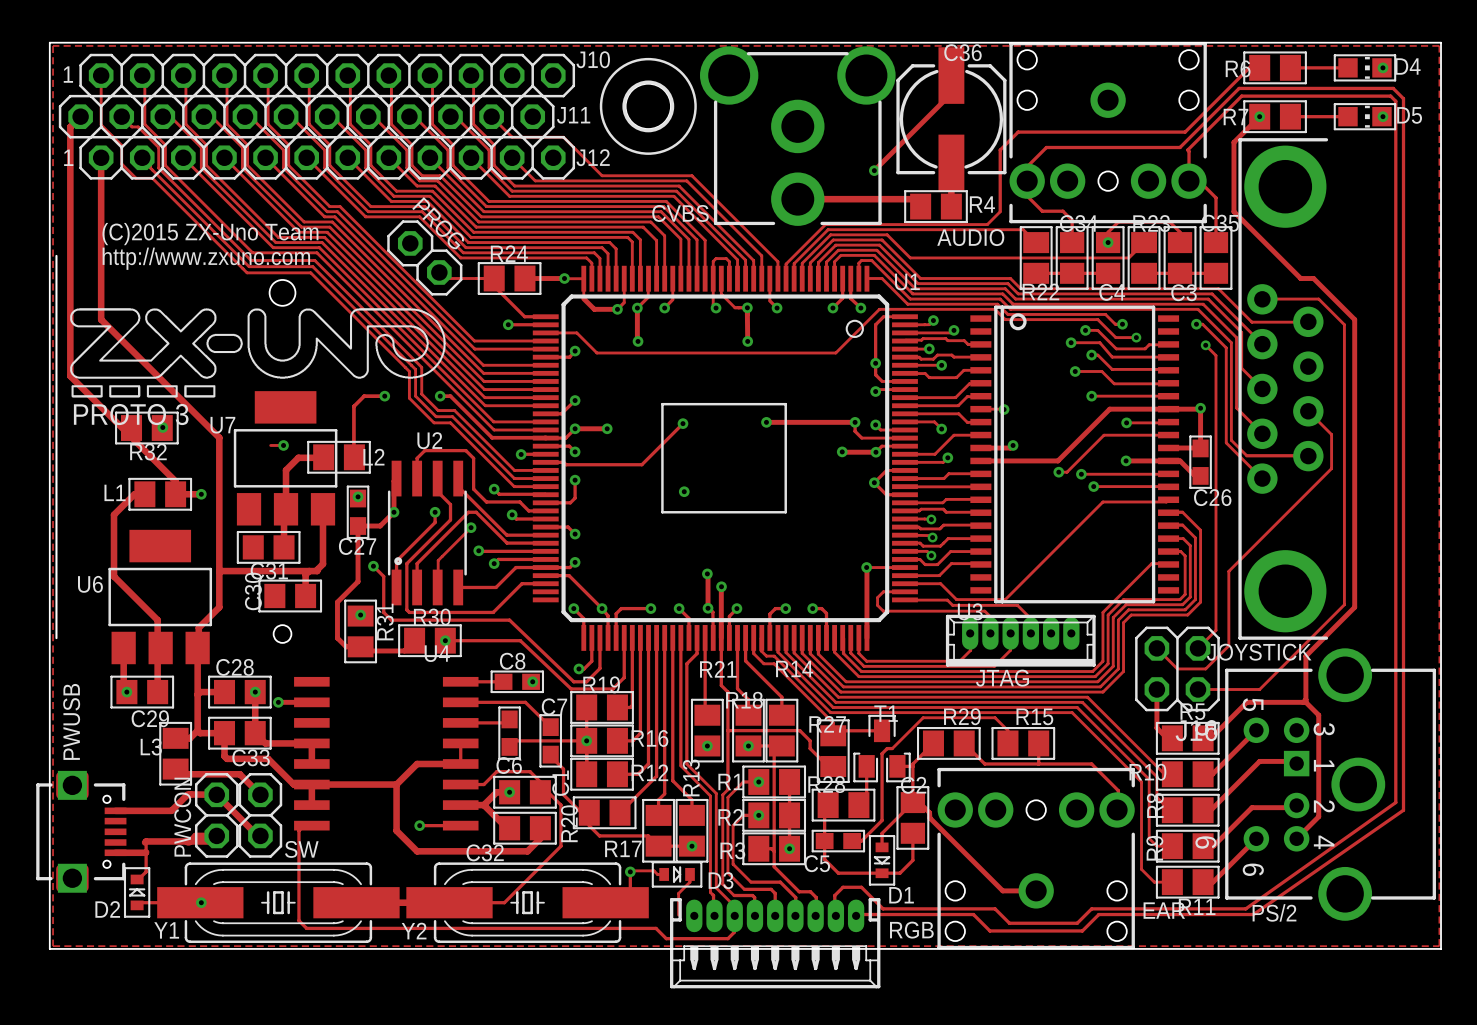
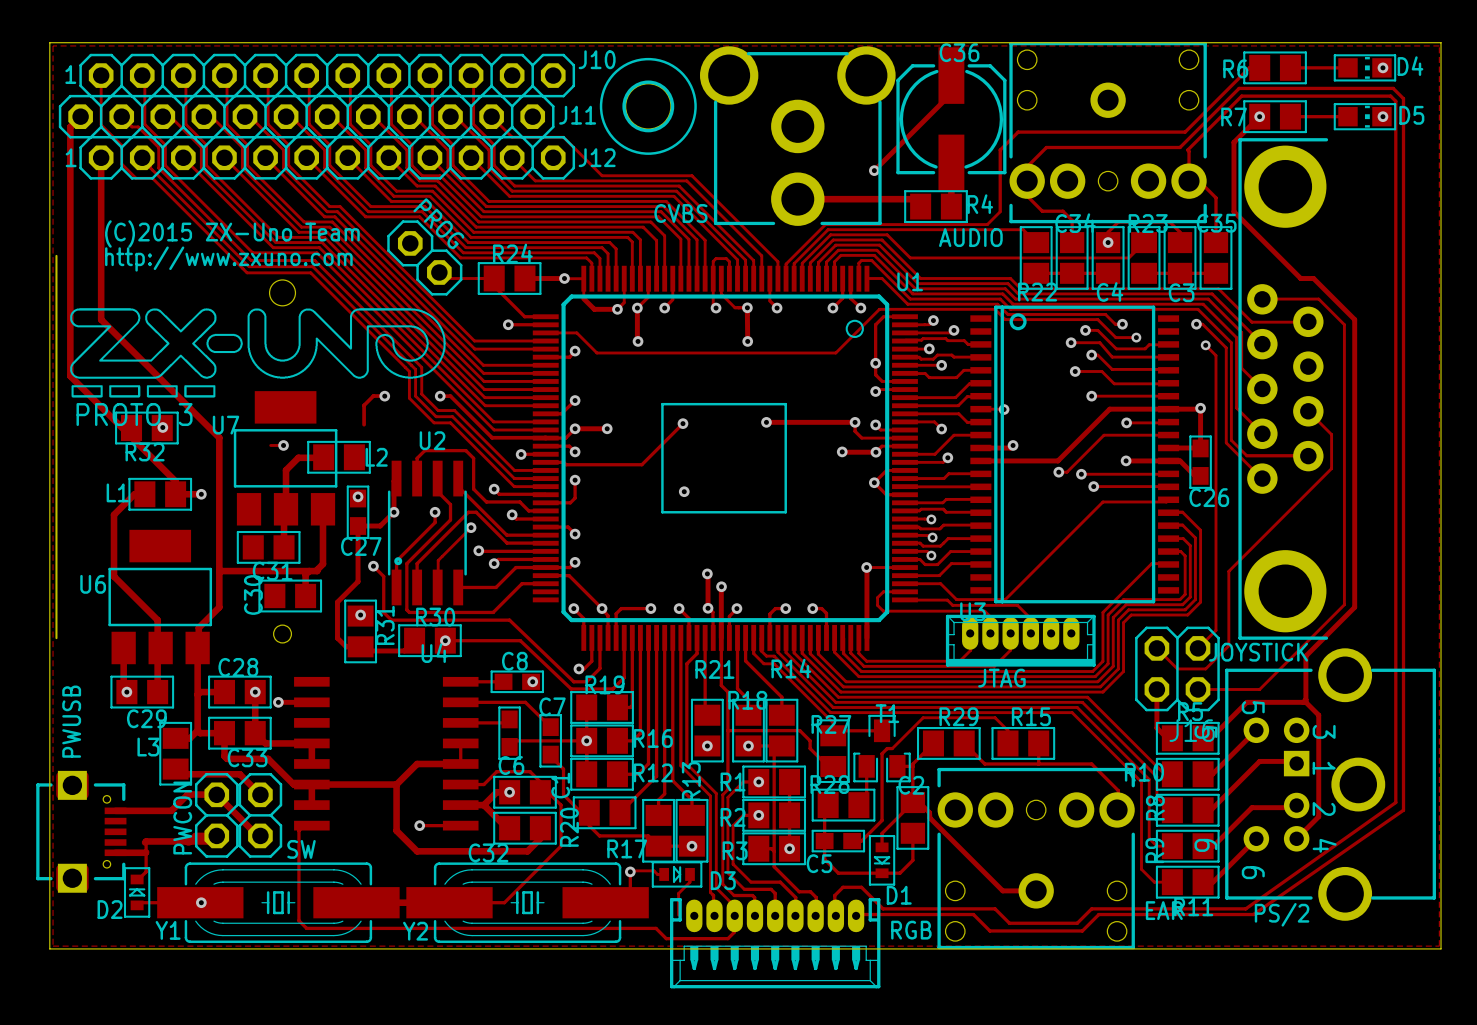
track: (384, 396) (364, 396) (353, 406) (354, 457) -> (384, 396) (373, 396) (364, 405) (364, 424)

